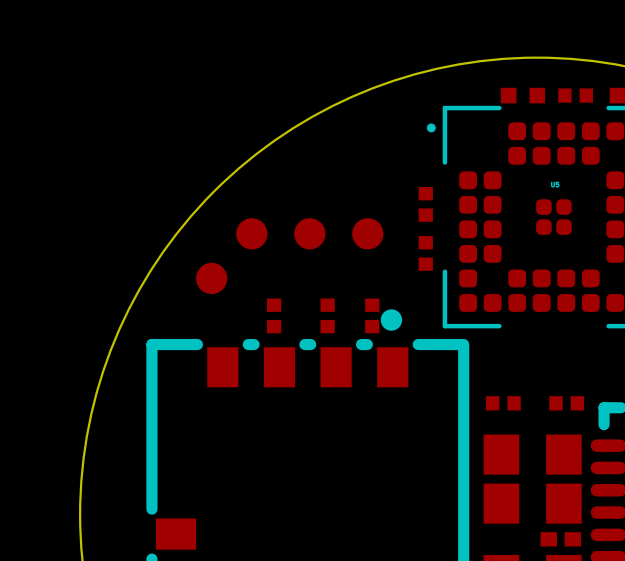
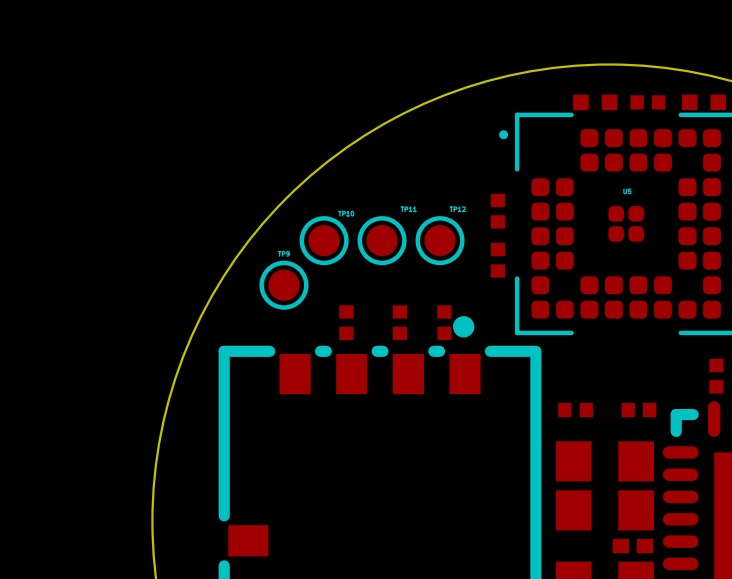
part: none -> (324, 240)
part: none -> (382, 240)
part: none -> (440, 240)
part: none -> (283, 285)

